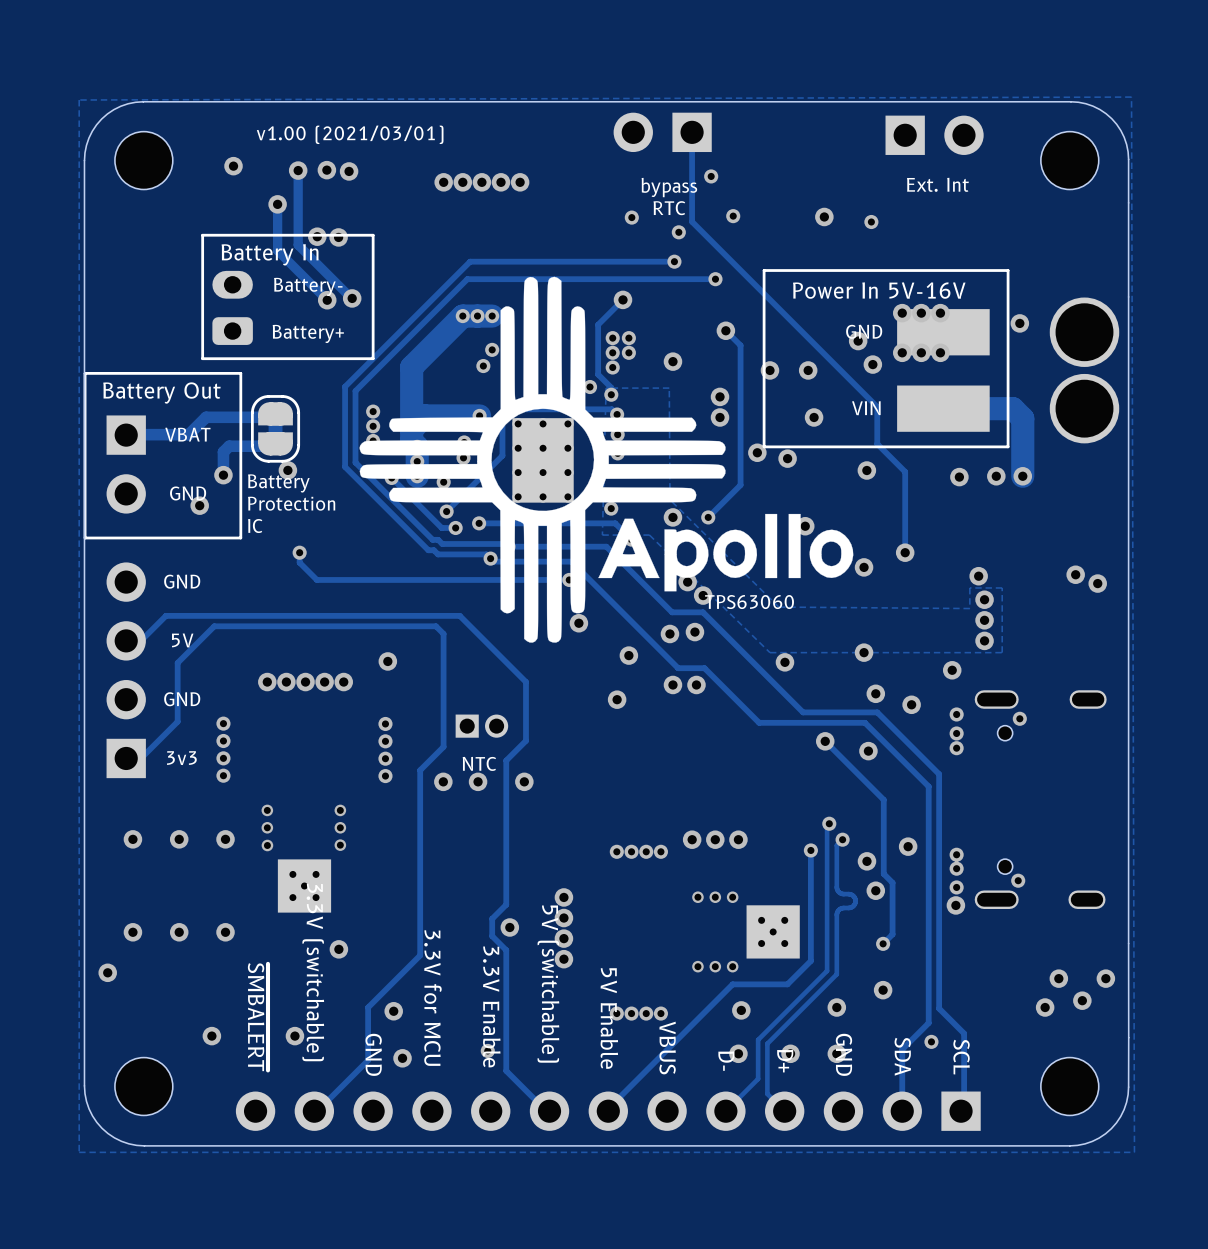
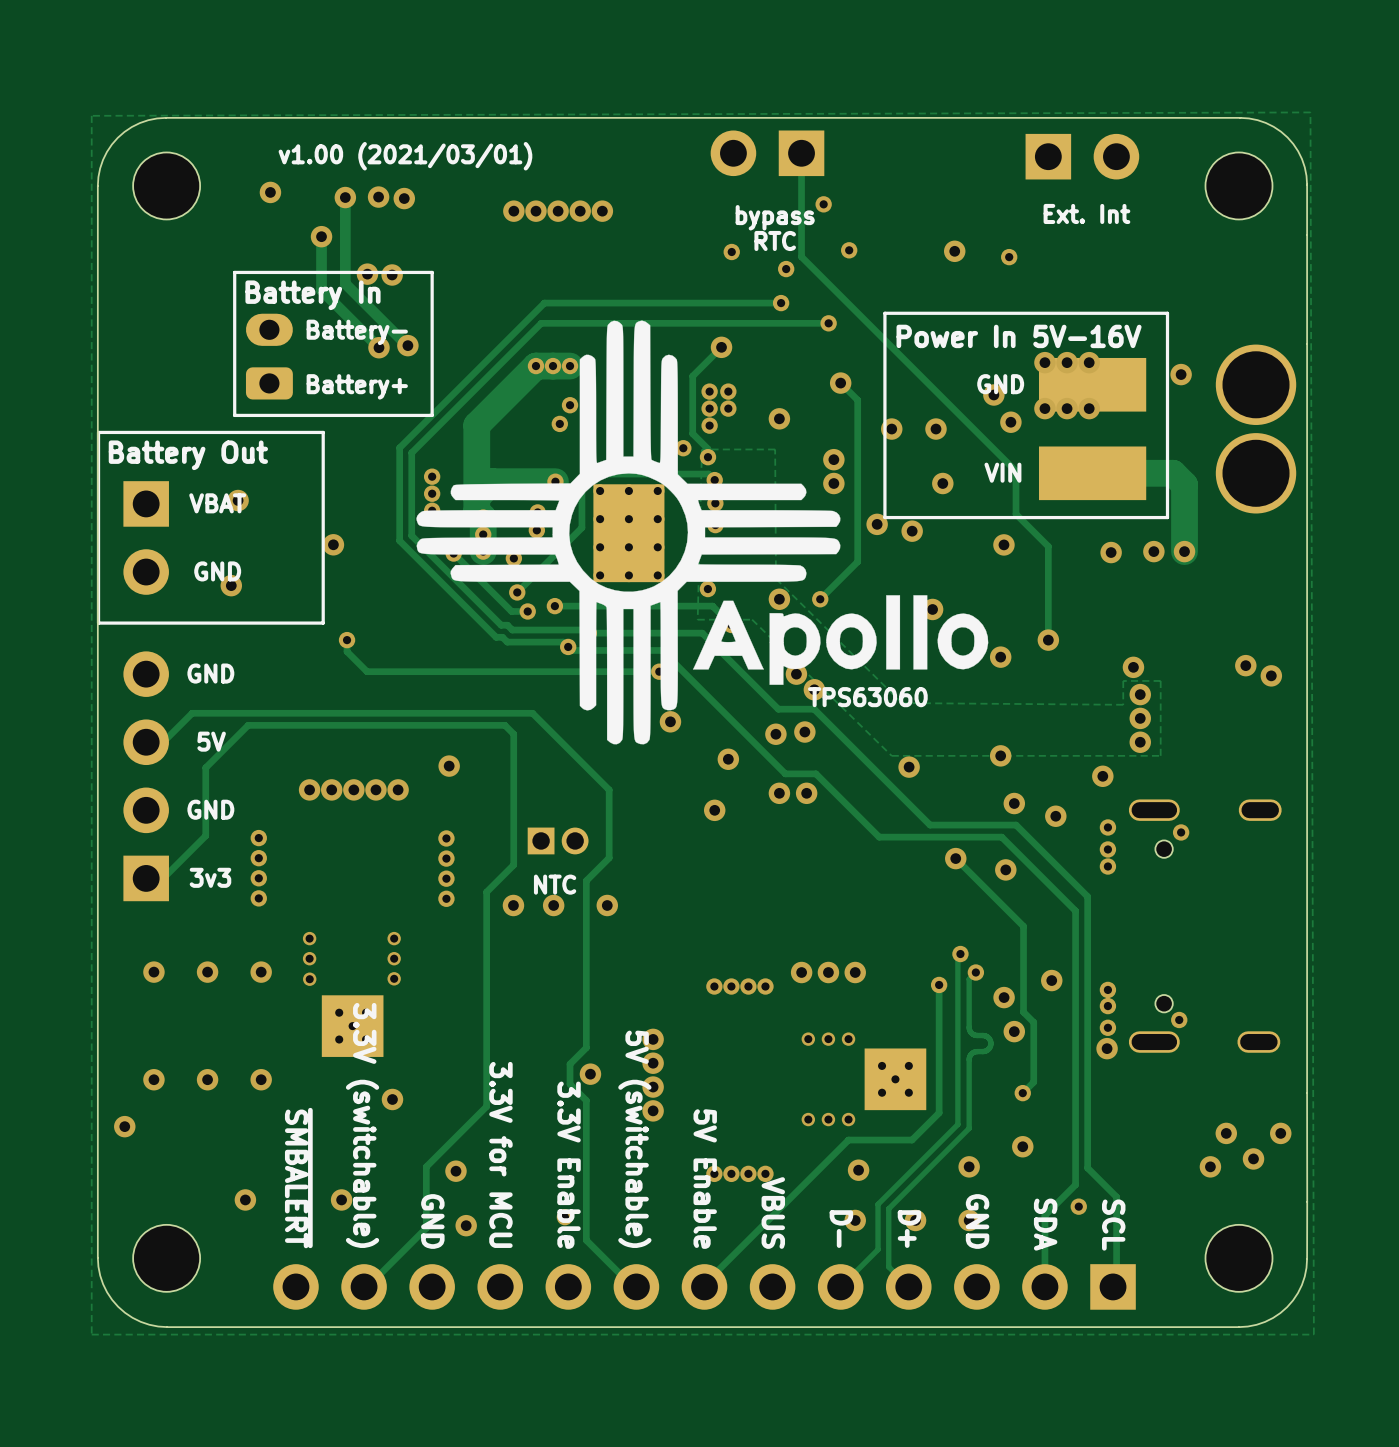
line: (240, 373) (240, 538) -> (278, 432) (323, 432) (323, 623) (278, 623)
track: (275, 417) (206, 417) (188, 434) (126, 435) -> none
part: (275, 428) -> none
track: (275, 446) (229, 446) (223, 452) (223, 475) -> none
via position: (223, 475) -> (238, 500)
text: Battery (278, 483) -> none
text: Protection (291, 503) -> none
text: IC (255, 526) -> none

